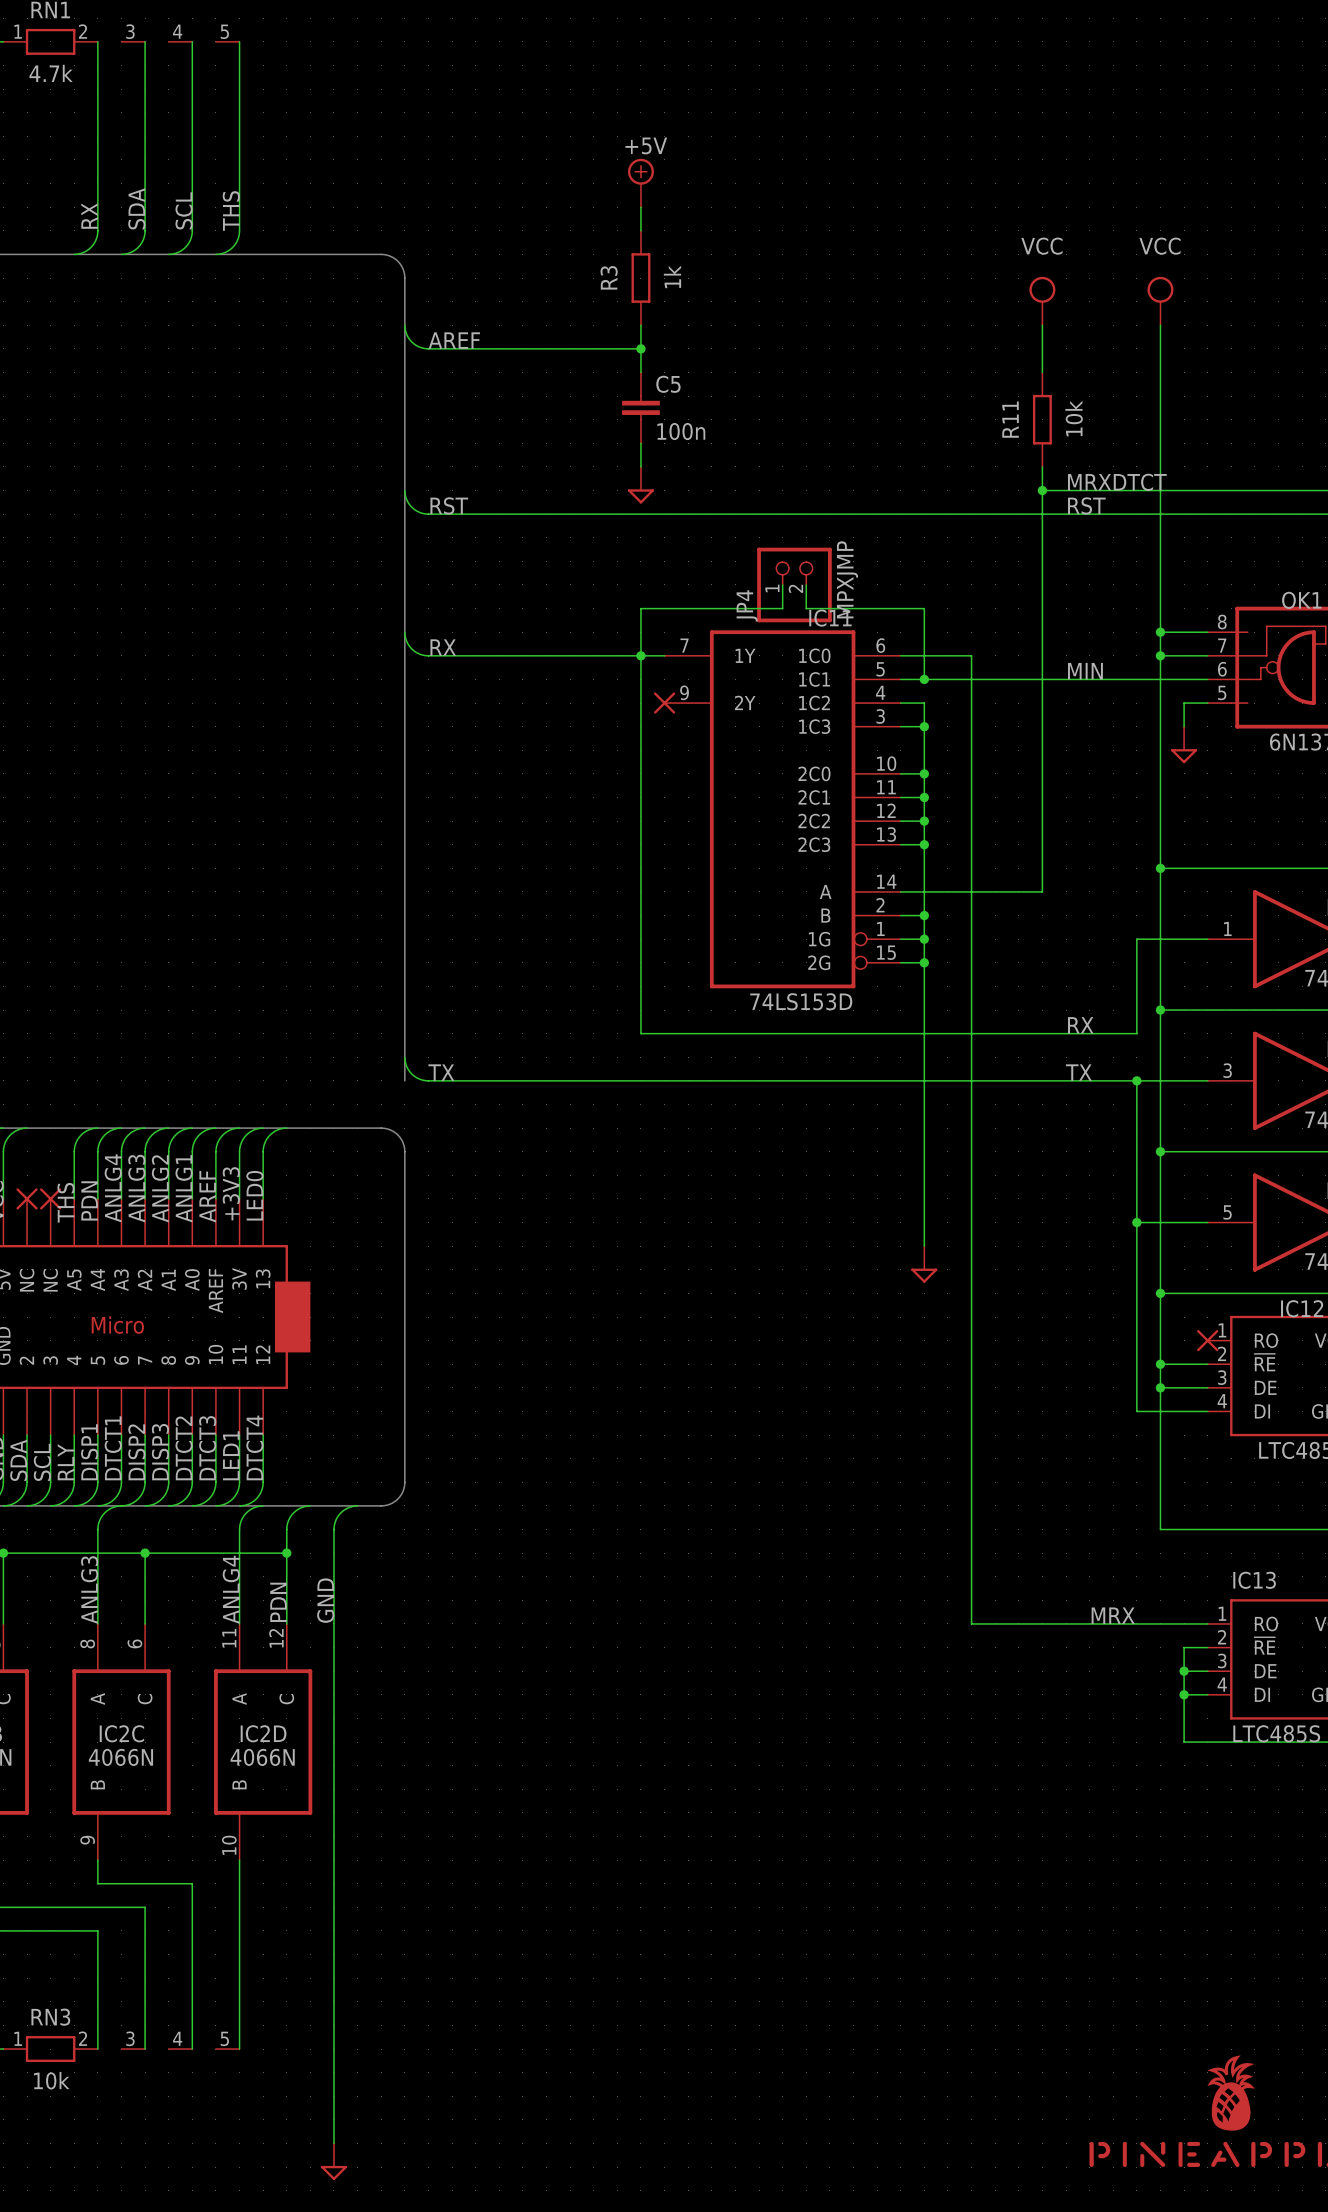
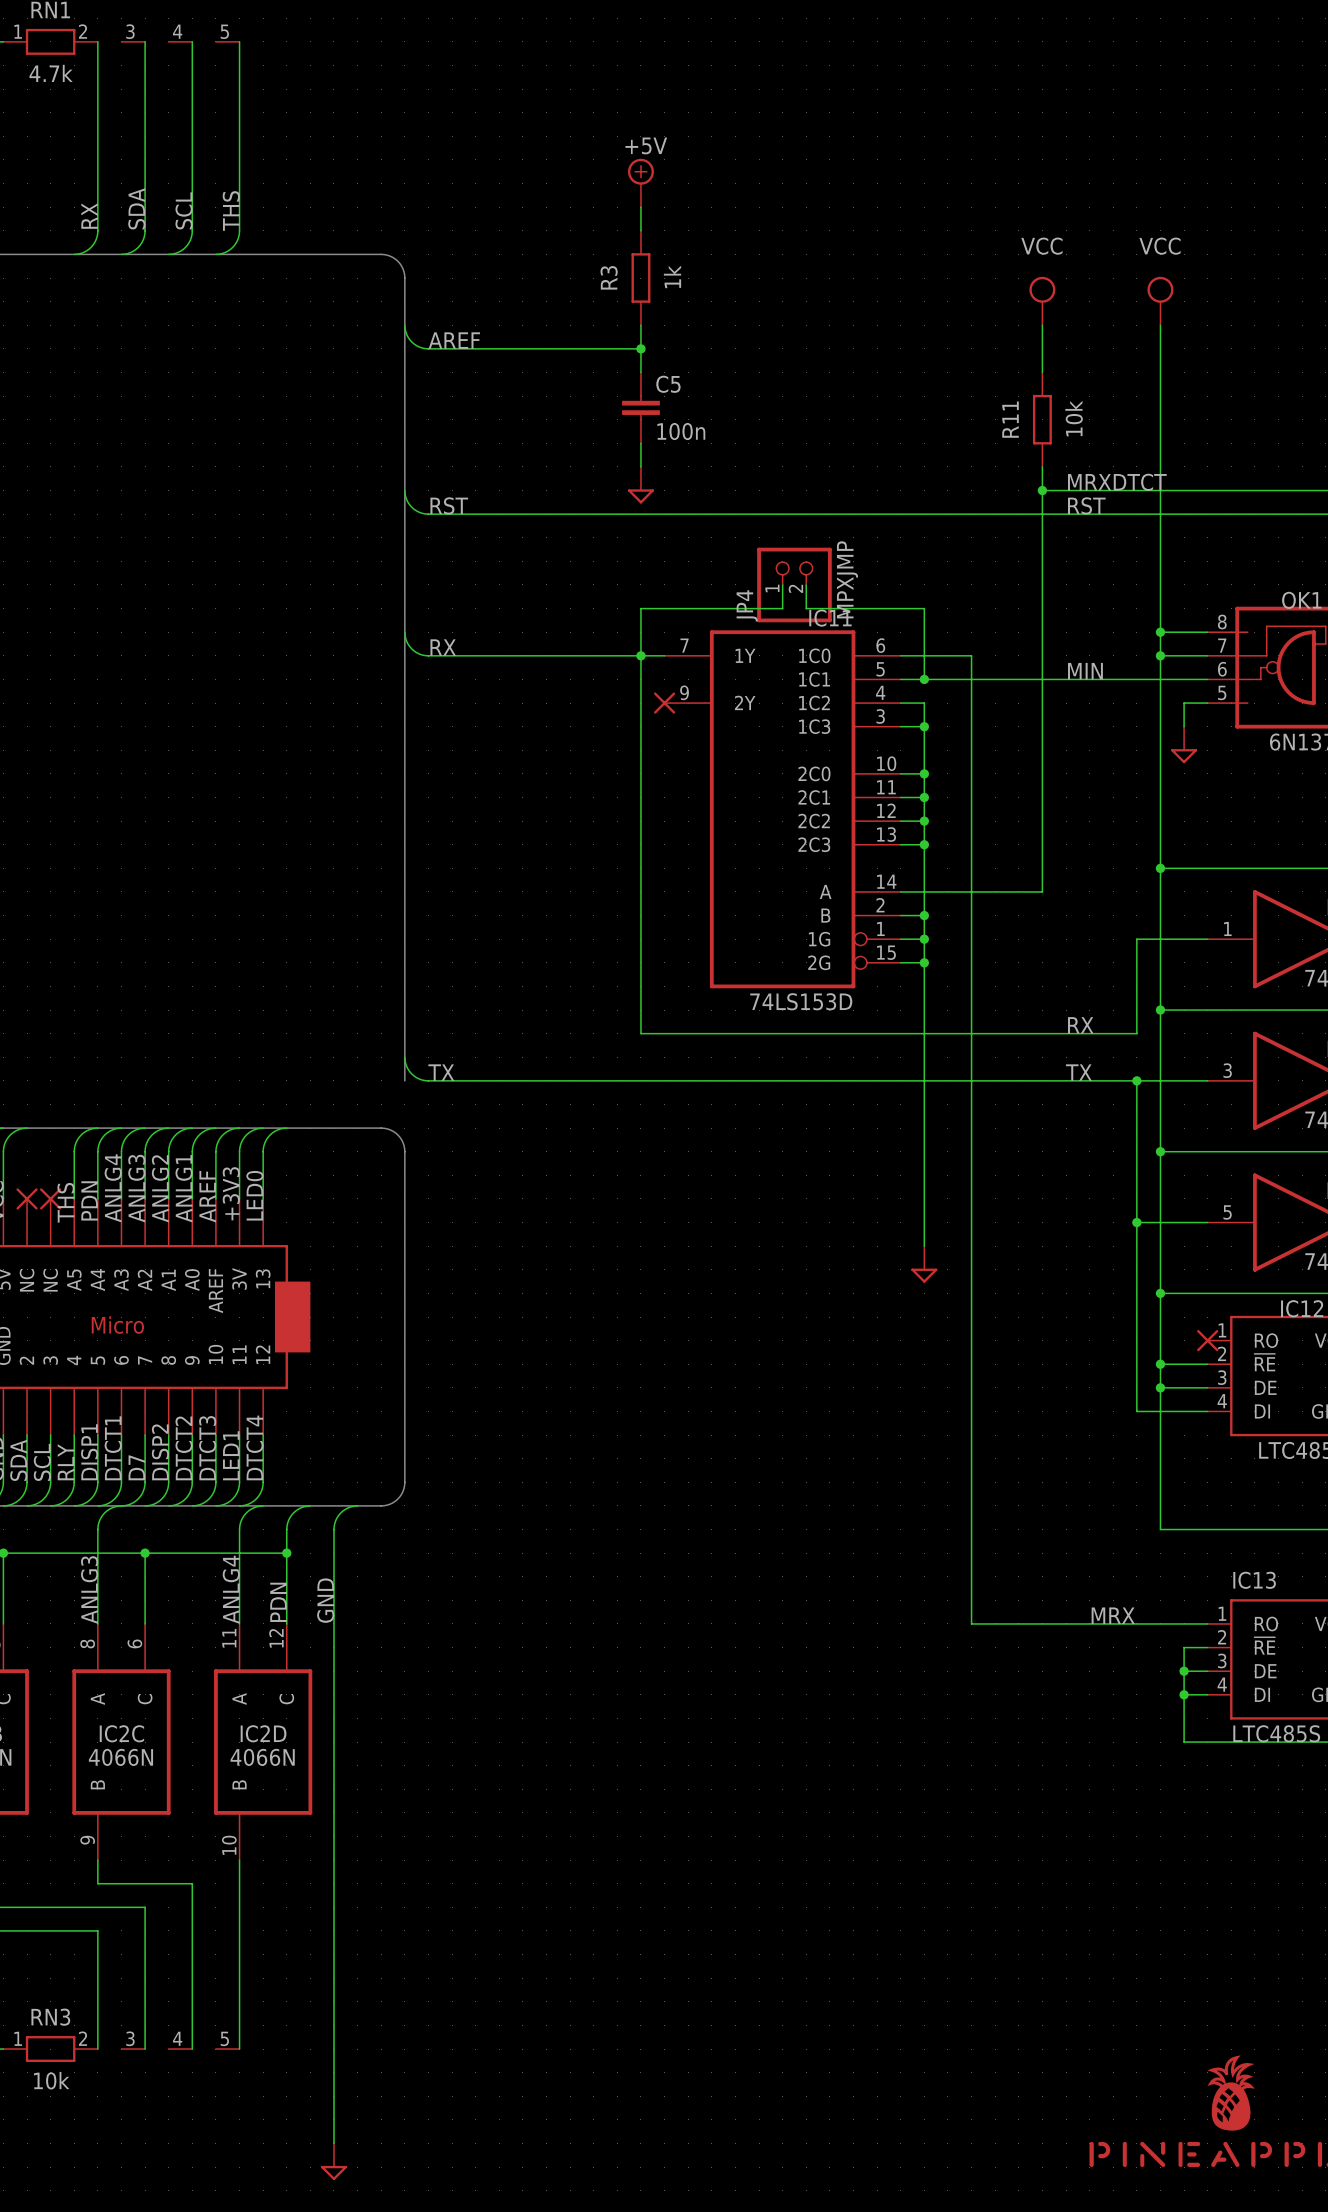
label: DISP2 (136, 1452) -> D7 (136, 1467)
label: DISP3 (160, 1452) -> DISP2 (160, 1452)

